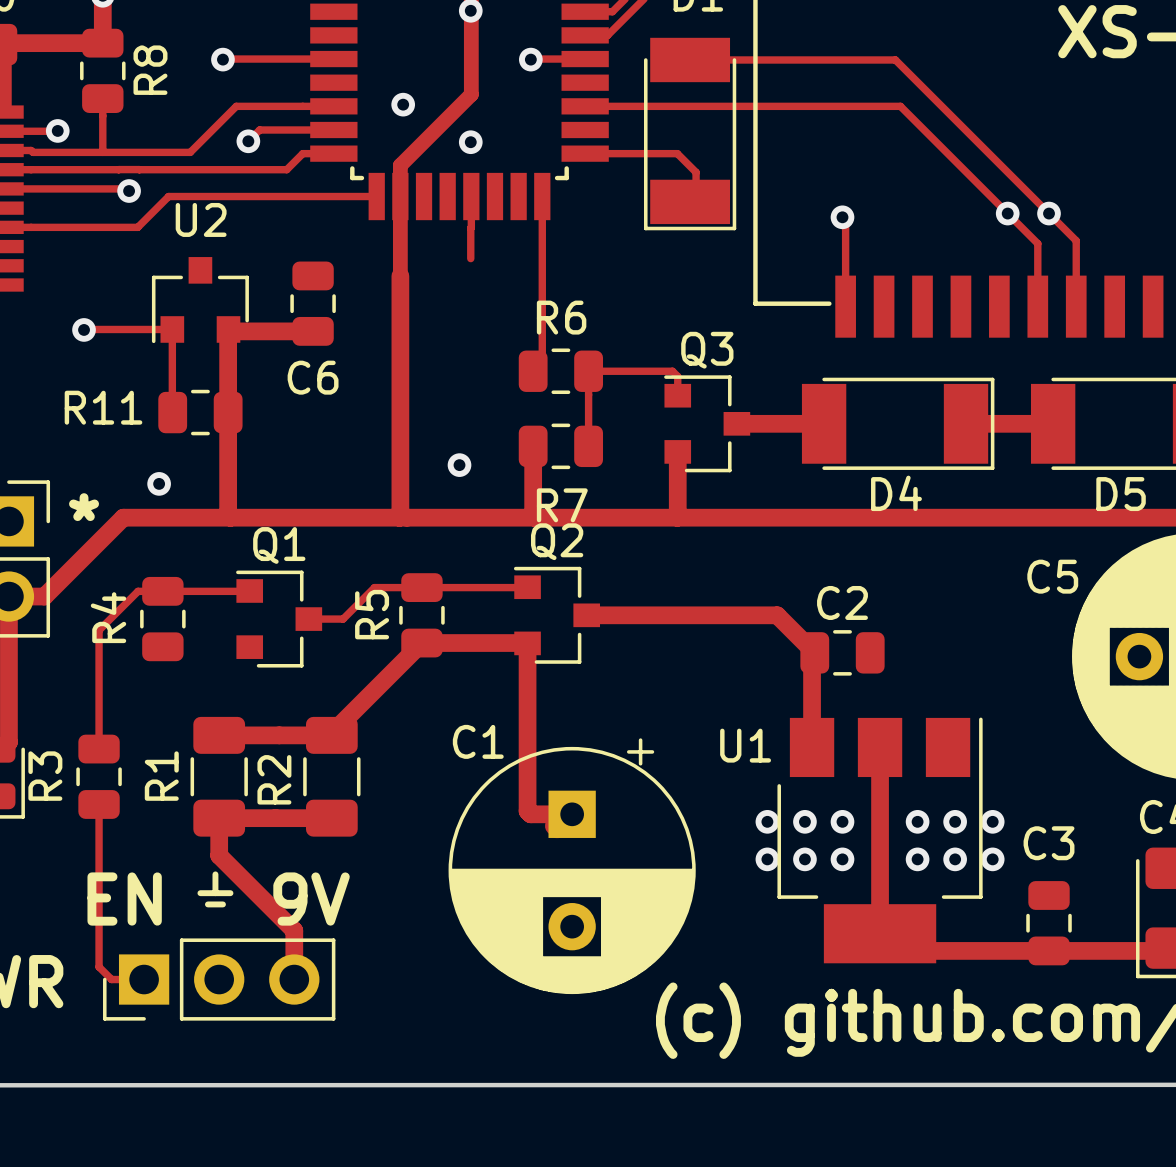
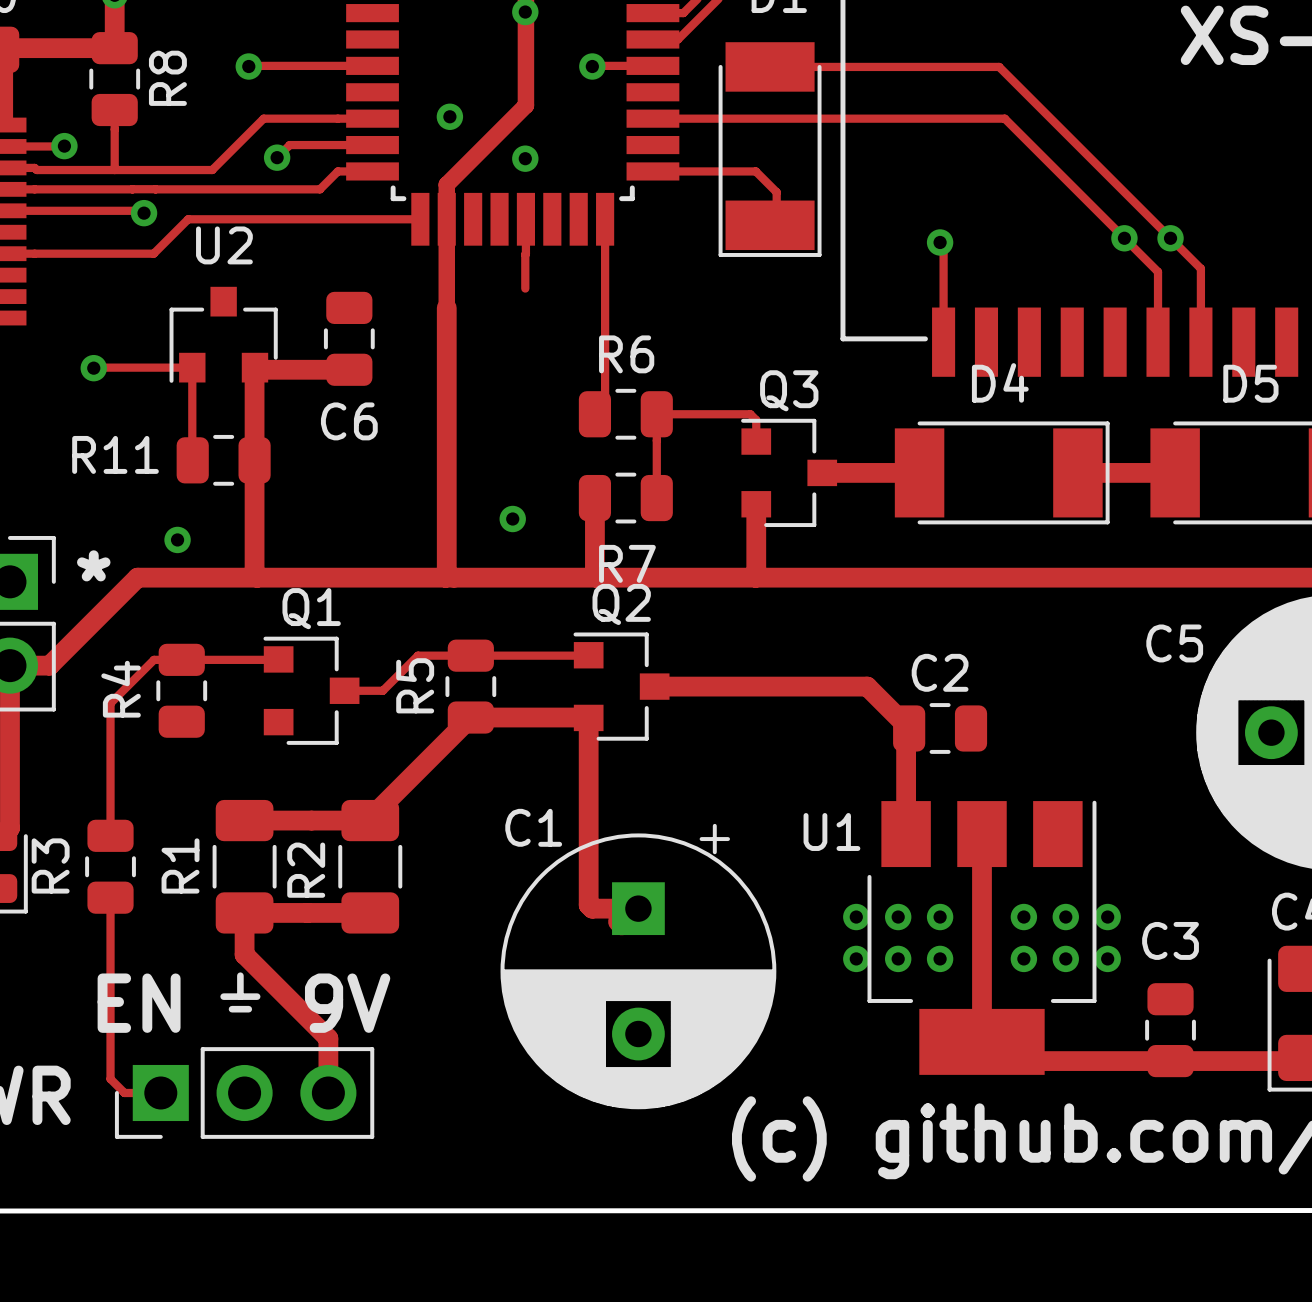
D4 name position: D4 (896, 493) -> D4 (1000, 382)
D5 name position: D5 (1121, 494) -> D5 (1250, 383)

